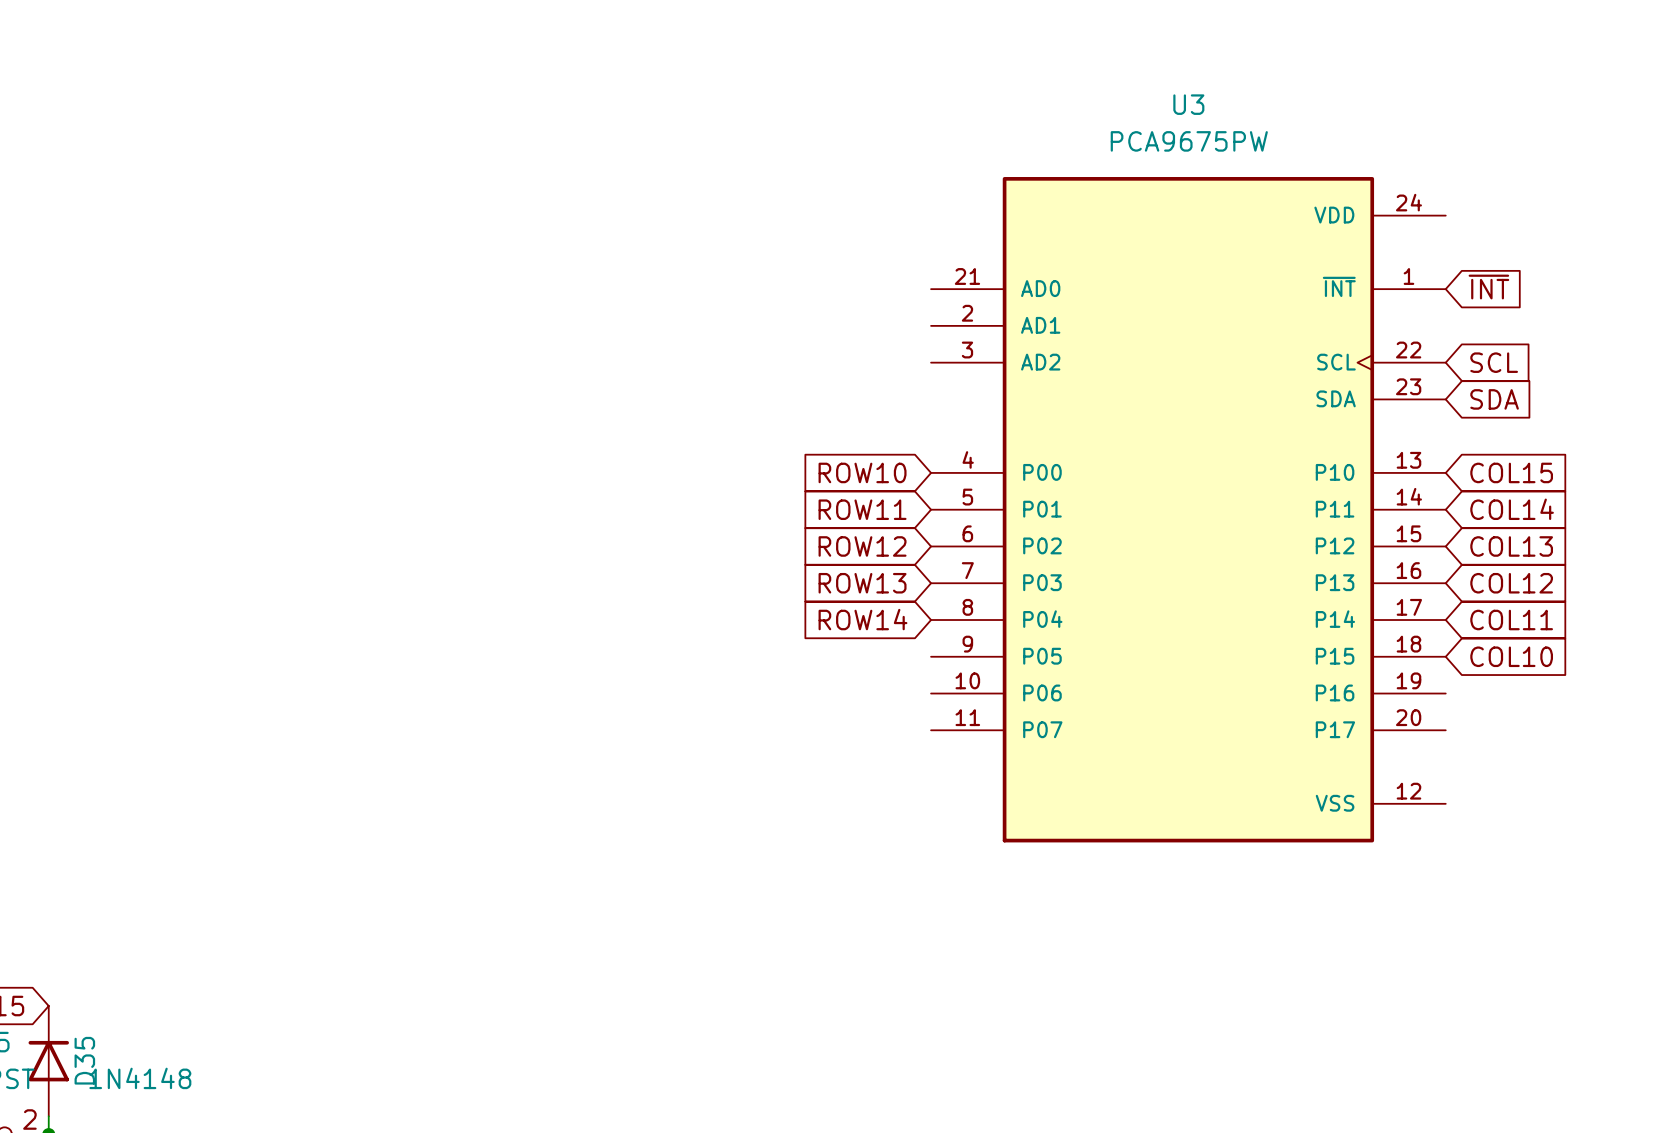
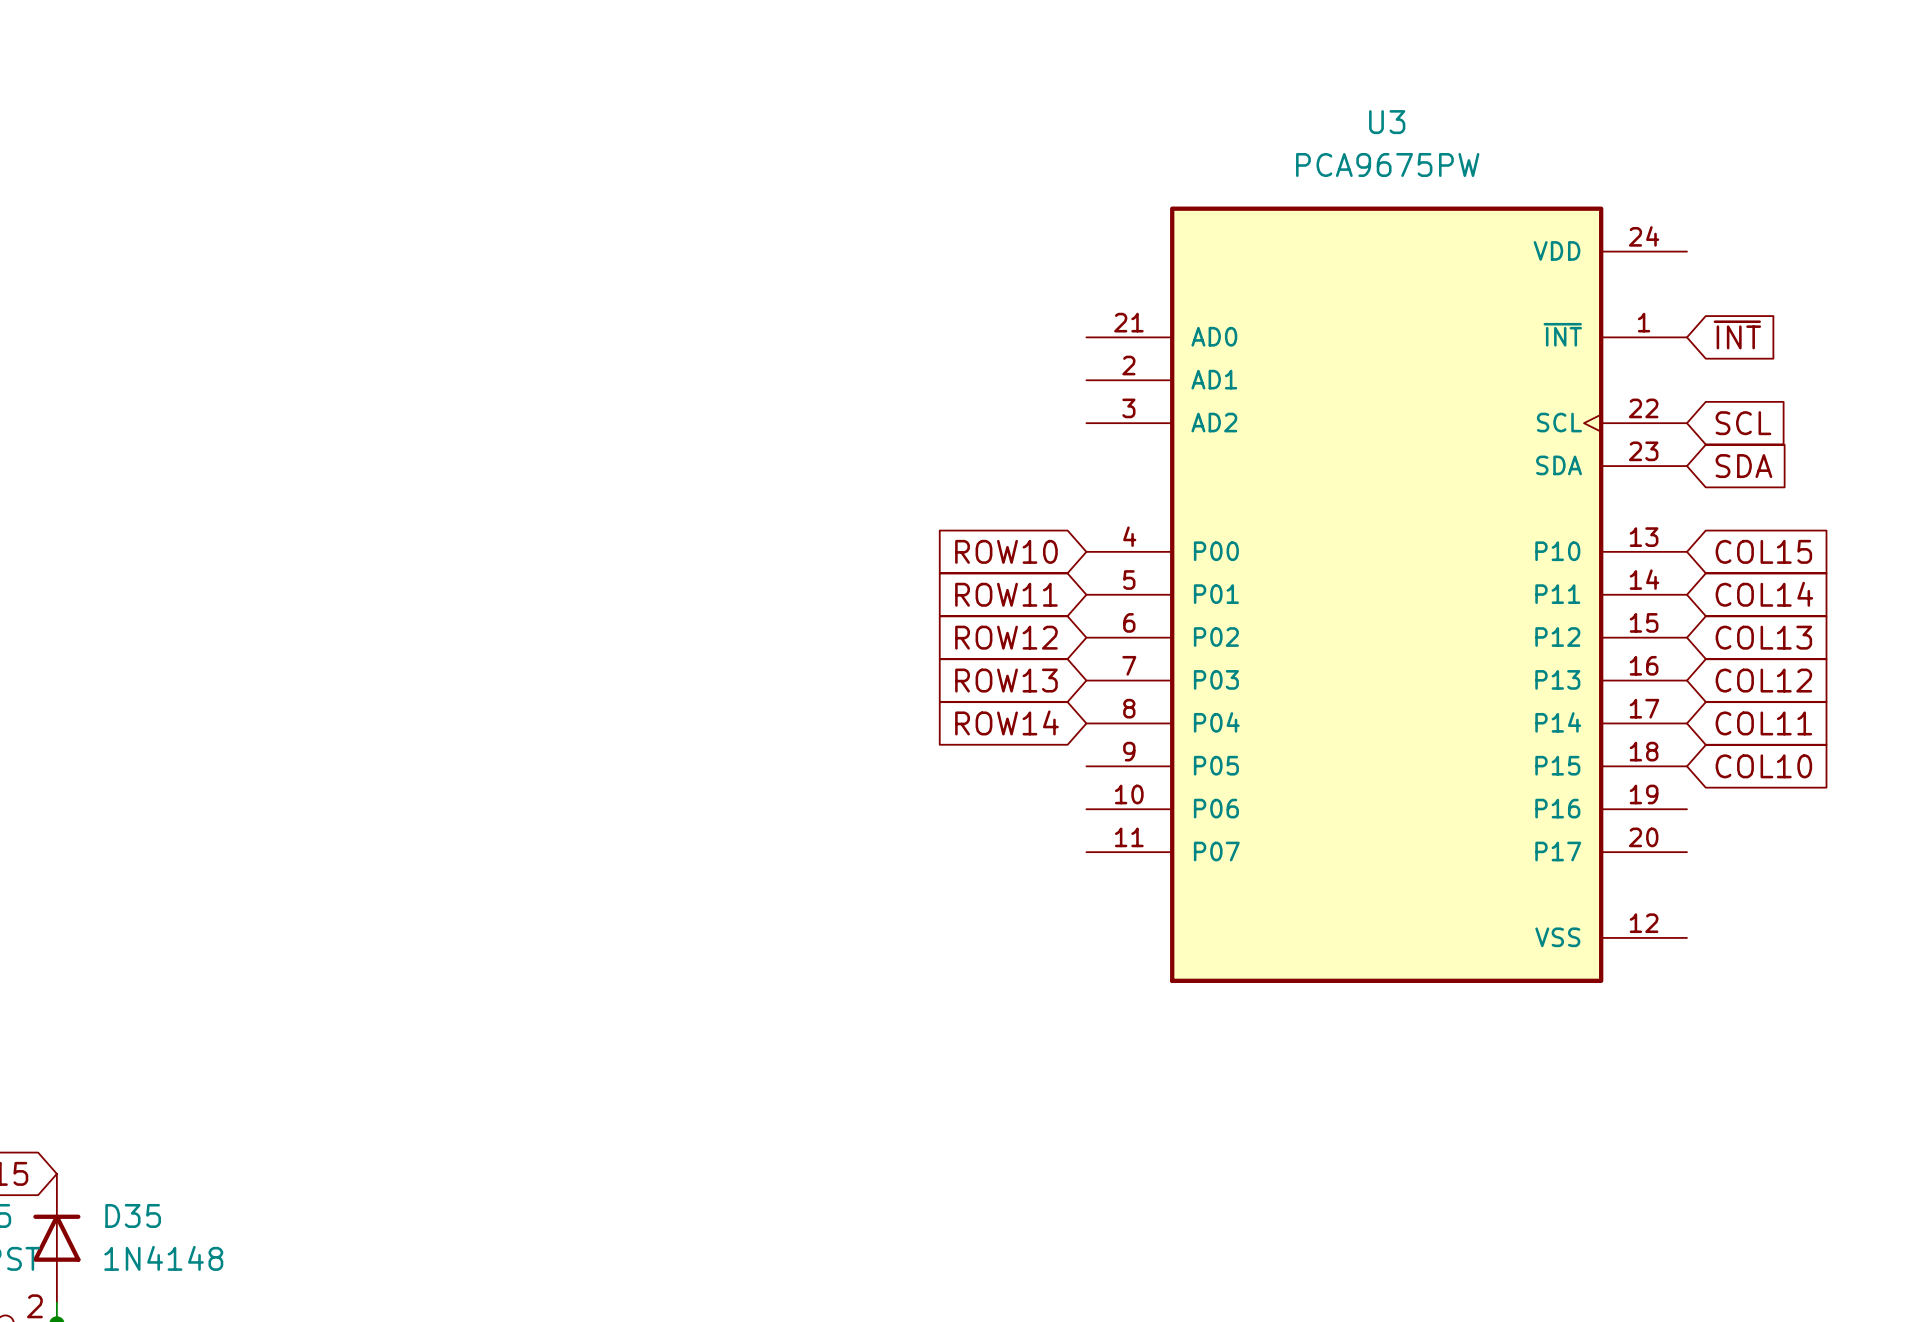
D35 name rotation: 0° (84, 1060) -> 90° clockwise (133, 1215)

